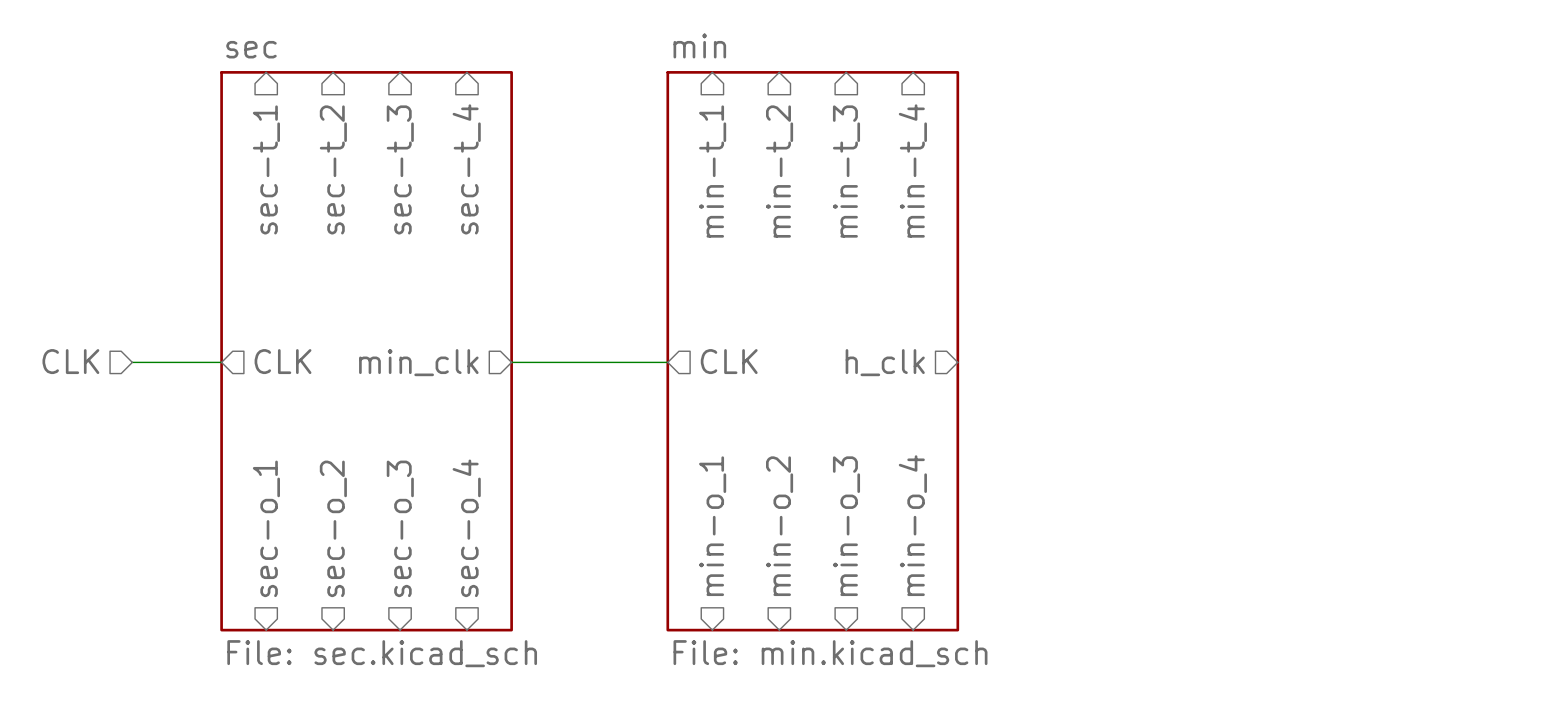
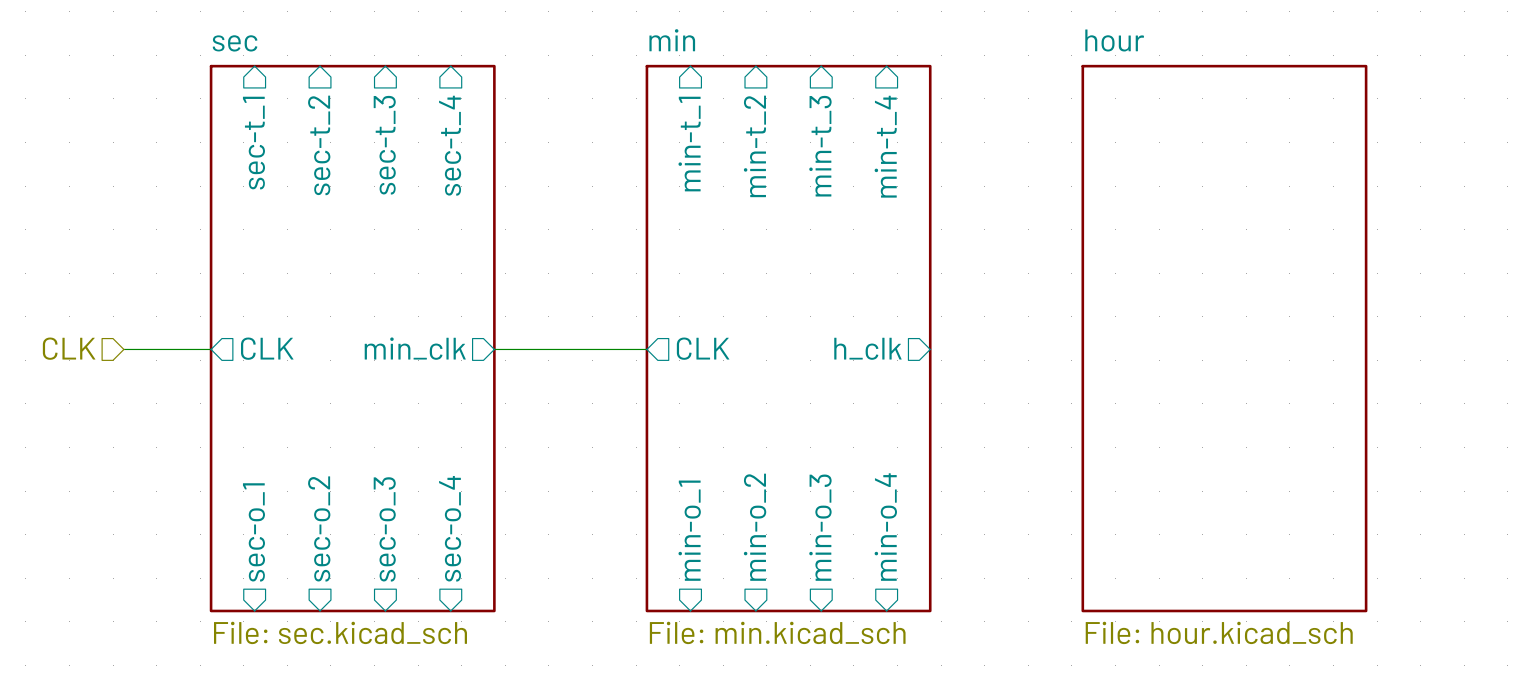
sheet hour: none -> File: hour.kicad_sch (1224, 338)

